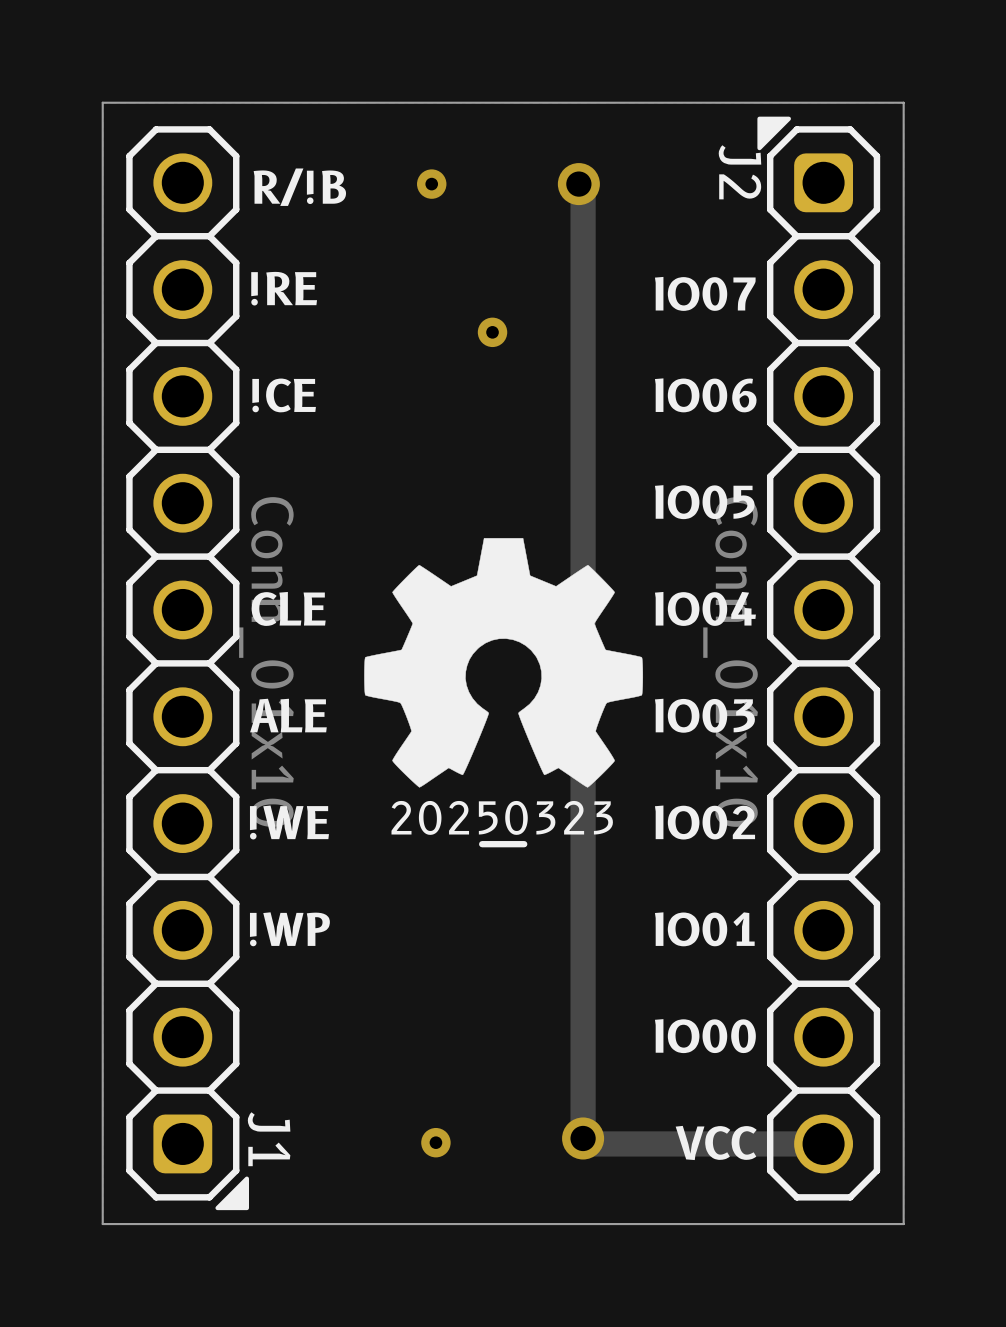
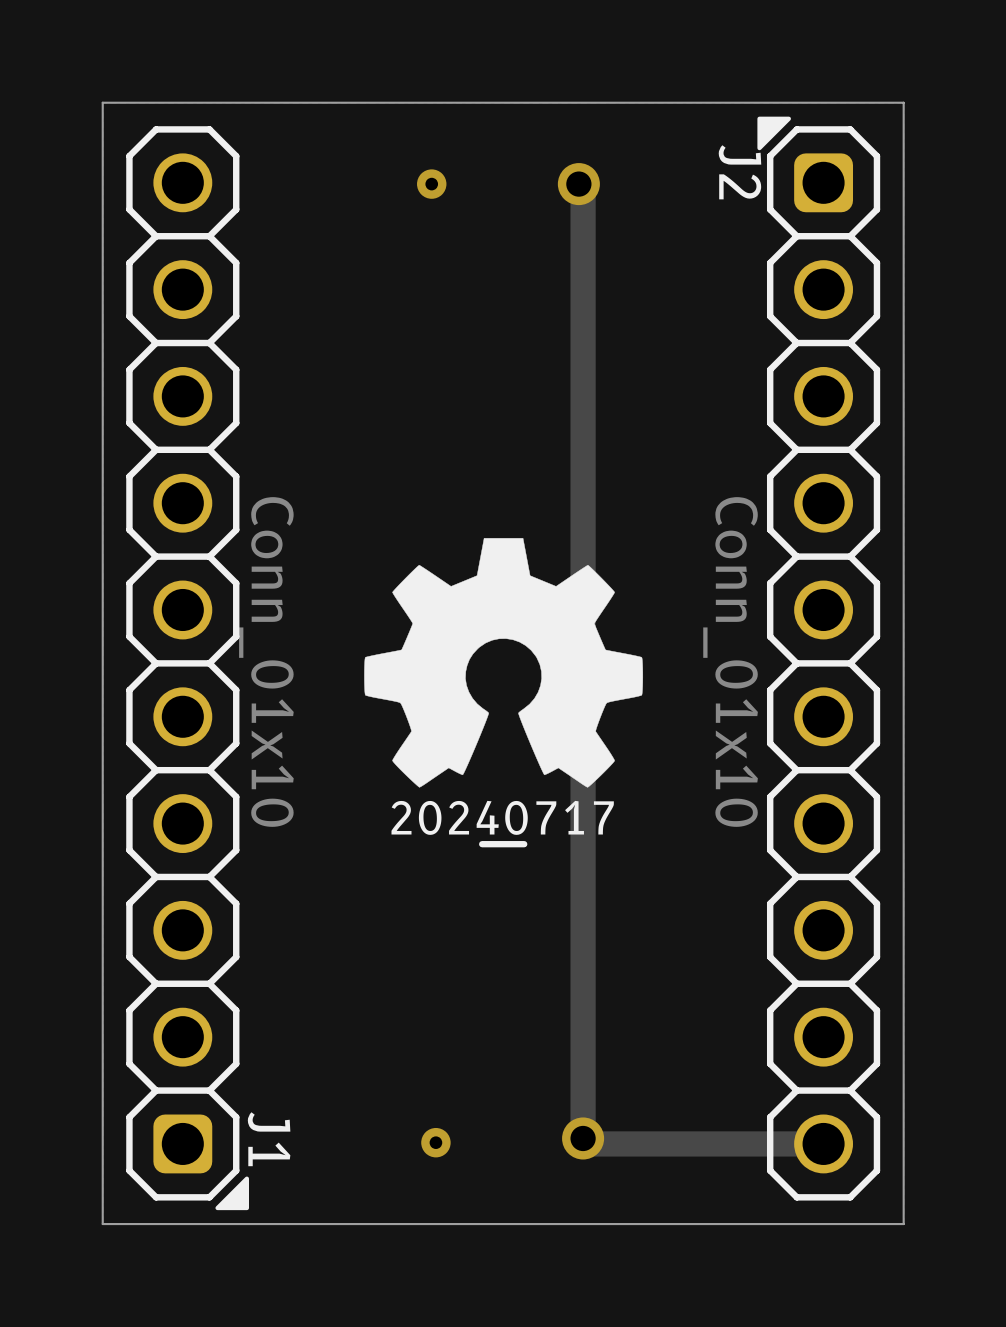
text: R/!B (299, 187) -> none
text: !RE (284, 288) -> none
text: IO07 (705, 293) -> none
via: (492, 332) -> none
text: !CE (284, 395) -> none
text: IO06 (705, 395) -> none
text: IO05 (704, 502) -> none
text: CLE (288, 608) -> none
text: IO04 (705, 608) -> none
text: ALE (288, 715) -> none
text: IO03 (704, 715) -> none
drawing shape: [391, 800, 613, 848] -> [391, 800, 614, 848]
text: !WE (289, 822) -> none
text: IO02 (705, 822) -> none
text: !WP (289, 929) -> none
text: IO01 (704, 929) -> none
text: IO00 (705, 1036) -> none
text: VCC (716, 1142) -> none

